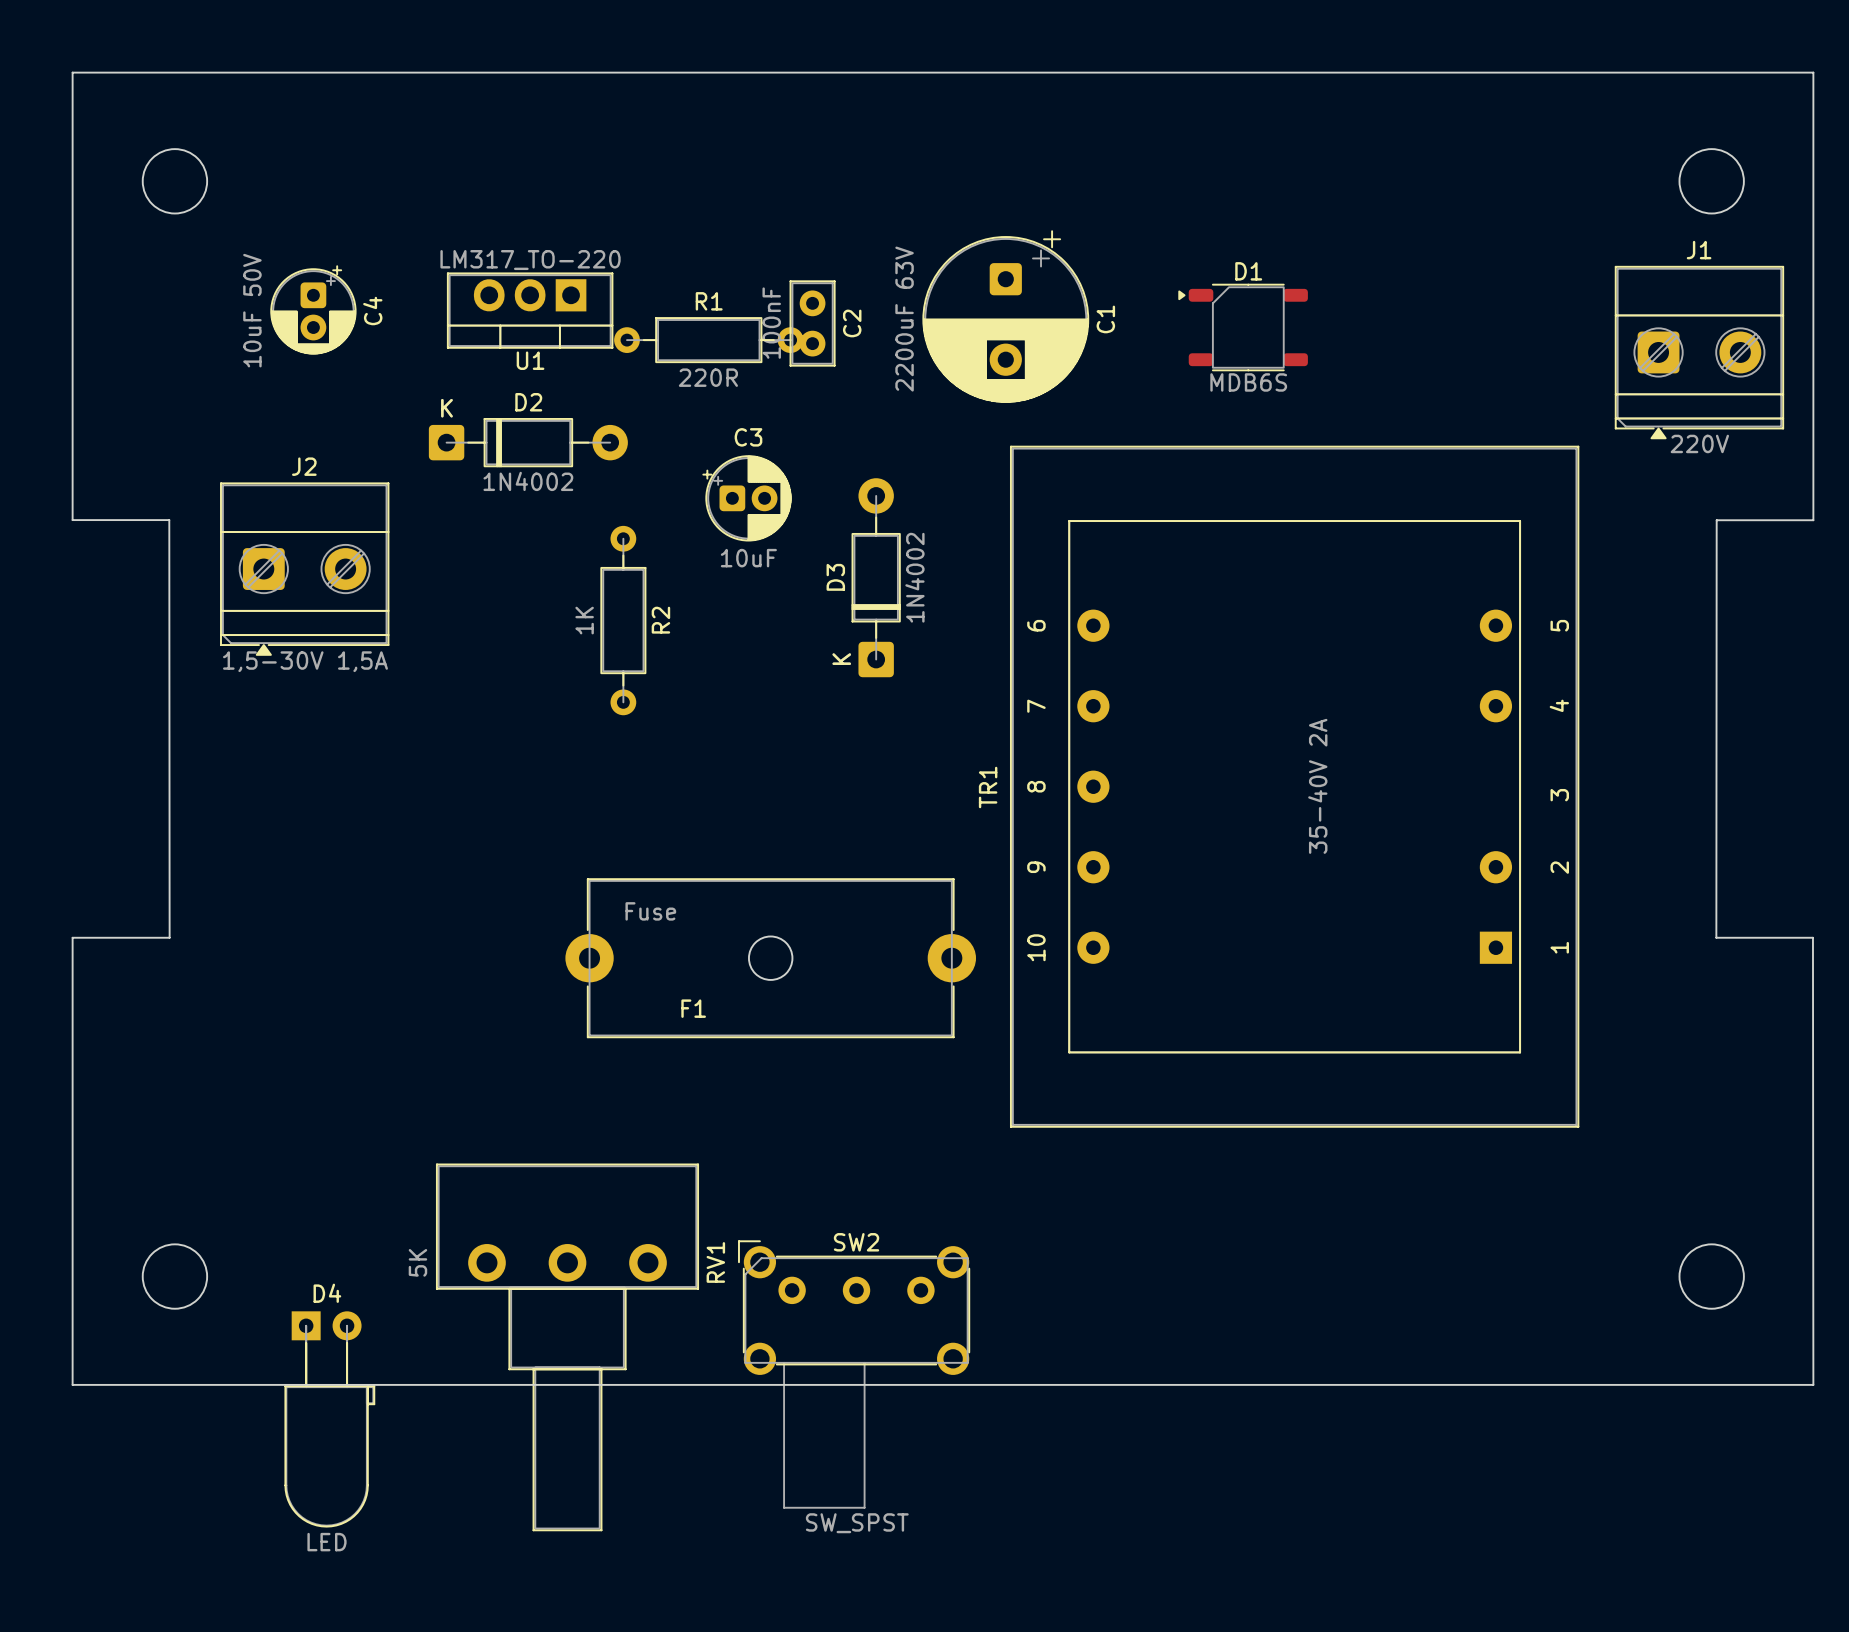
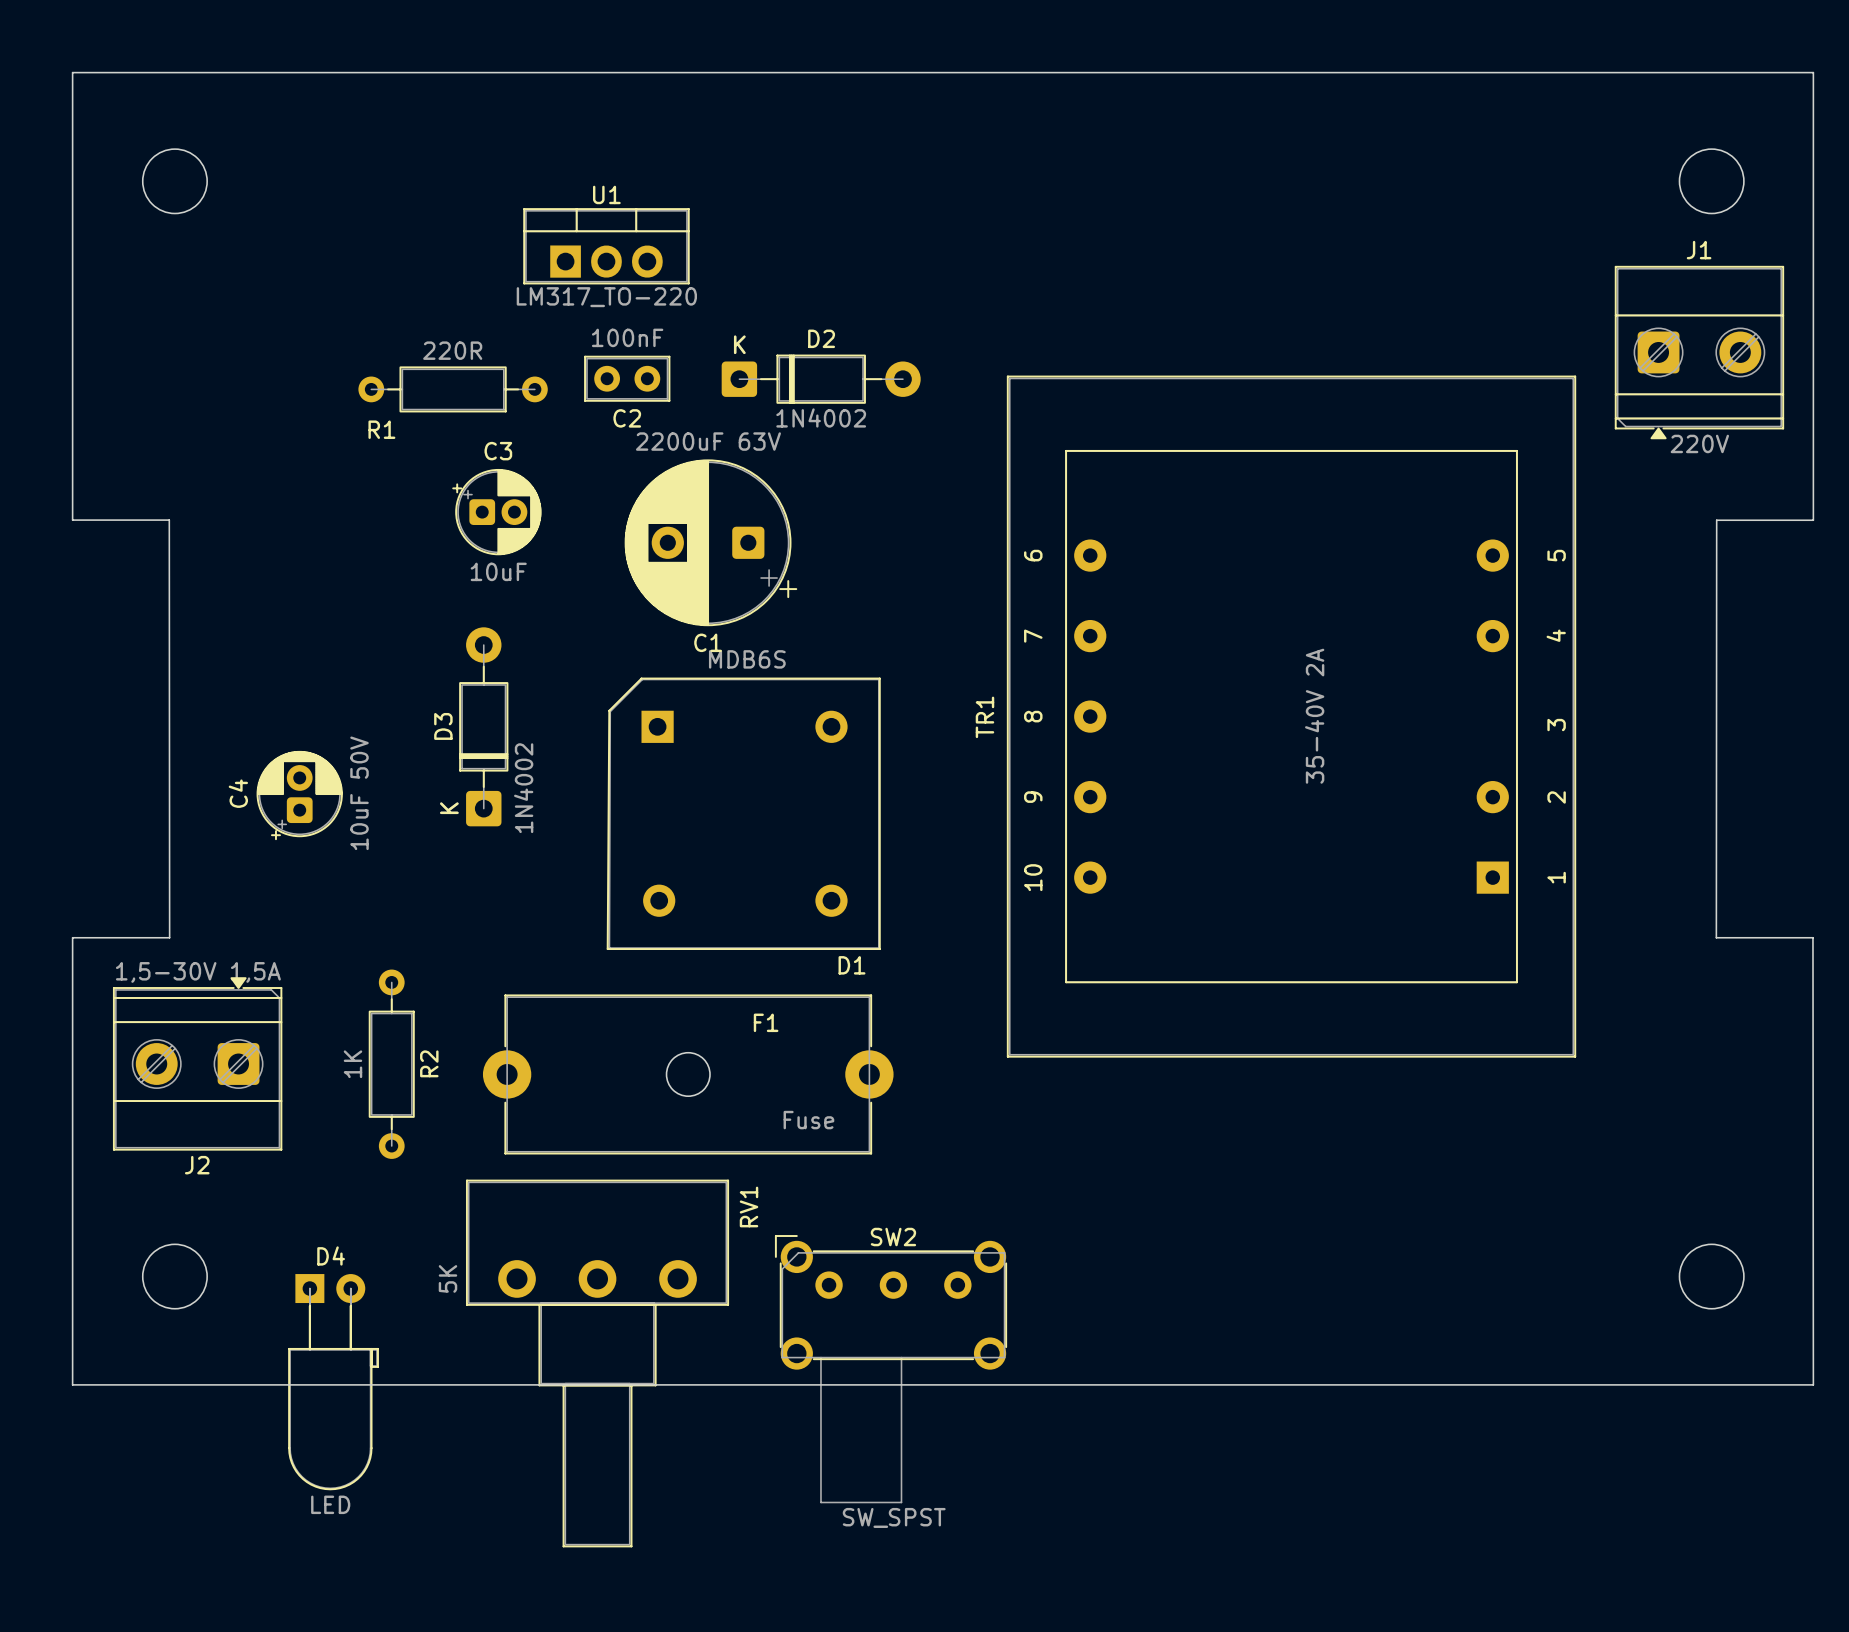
D1 name position: D1 (1248, 271) -> D1 (852, 965)
D1 footprint: [1178, 283, 1308, 372] -> [606, 677, 881, 951]
R1 name position: R1 (709, 301) -> R1 (381, 429)
C4 rotation: 0° (313, 309) -> 180° (299, 795)
C4 position: (313, 309) -> (299, 795)
U1 rotation: 0° (530, 310) -> 180° (606, 246)
C1 rotation: 0° (1005, 316) -> 90° clockwise (710, 542)
C1 position: (1005, 316) -> (710, 542)
C2 rotation: 0° (812, 323) -> 90° clockwise (627, 378)
C2 position: (812, 323) -> (627, 378)
R1 position: (708, 340) -> (453, 389)
R1 value position: 220R (708, 377) -> 220R (452, 350)
D1 value position: MDB6S (1248, 382) -> MDB6S (747, 659)
D2 position: (528, 442) -> (821, 379)
C3 position: (746, 498) -> (496, 512)
J2 rotation: 0° (304, 569) -> 180° (197, 1063)
J2 position: (304, 569) -> (197, 1063)
D3 position: (876, 577) -> (483, 726)
D3 value position: 1N4002 (914, 577) -> 1N4002 (523, 788)
R2 position: (623, 620) -> (391, 1064)
TR1 position: (1294, 786) -> (1291, 716)
F1 value position: Fuse (650, 911) -> Fuse (808, 1120)
F1 position: (770, 958) -> (688, 1074)
F1 name position: F1 (693, 1008) -> F1 (766, 1022)
RV1 name position: RV1 (715, 1262) -> RV1 (749, 1207)
RV1 position: (567, 1347) -> (597, 1363)
SW2 position: (854, 1374) -> (891, 1369)
D4 position: (329, 1419) -> (333, 1382)

